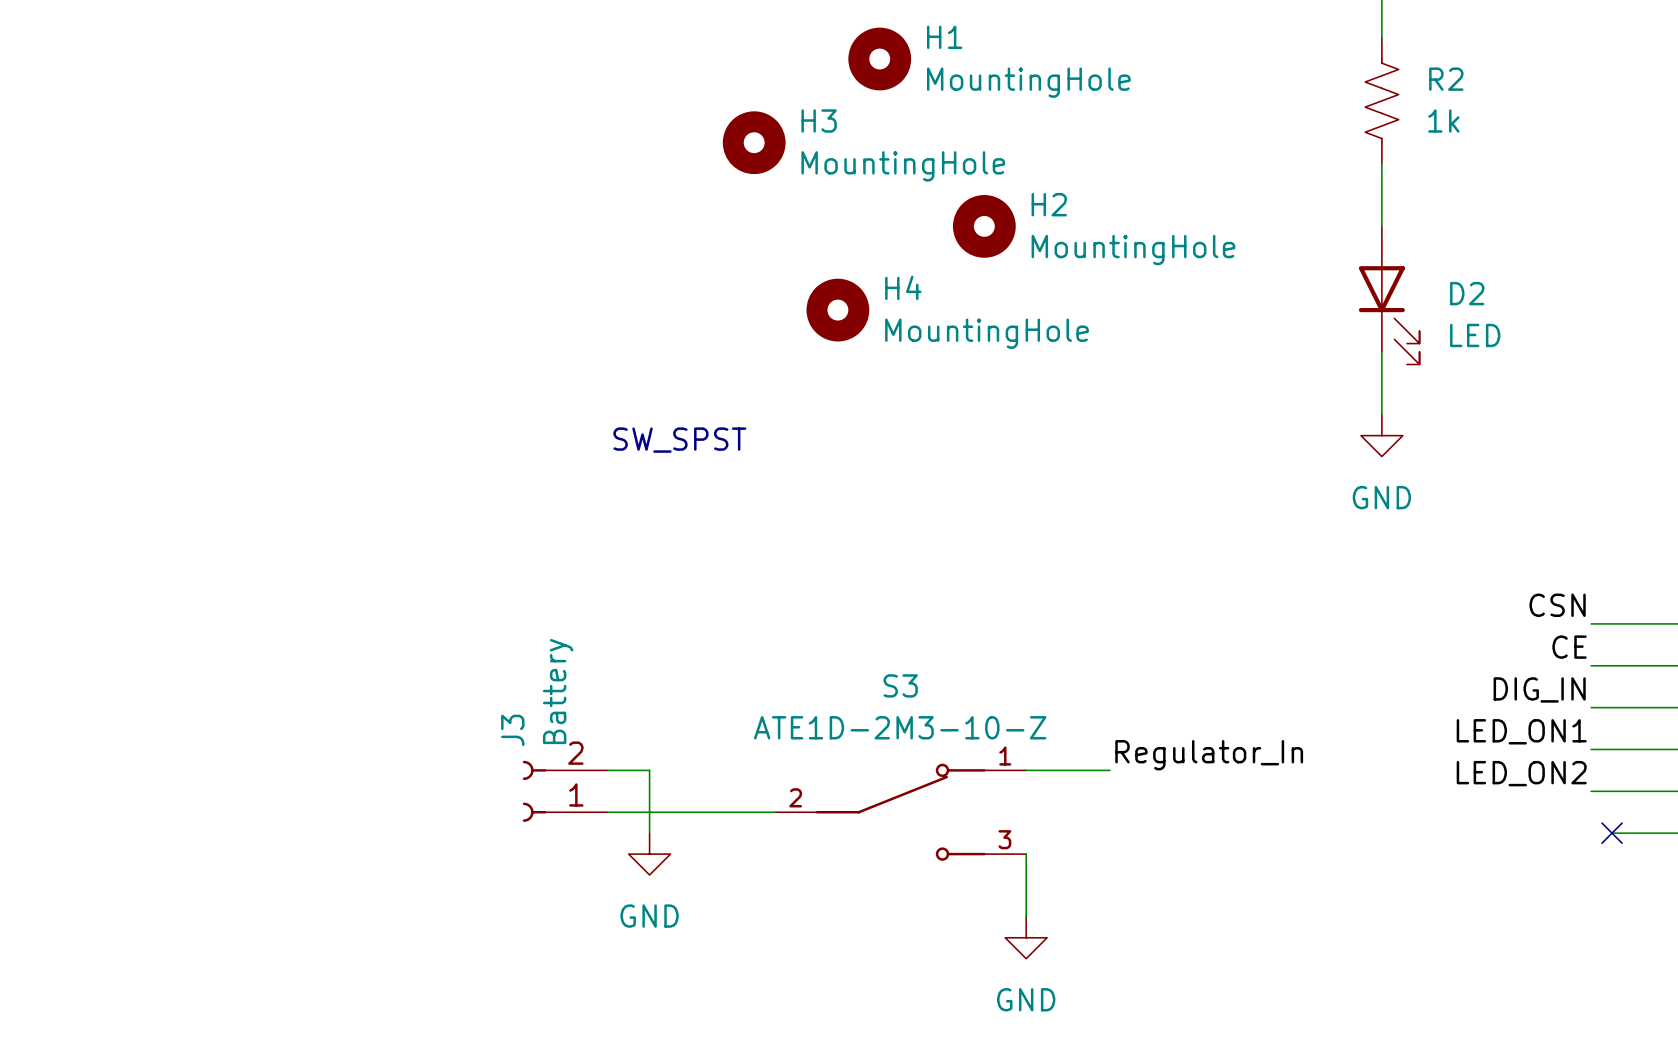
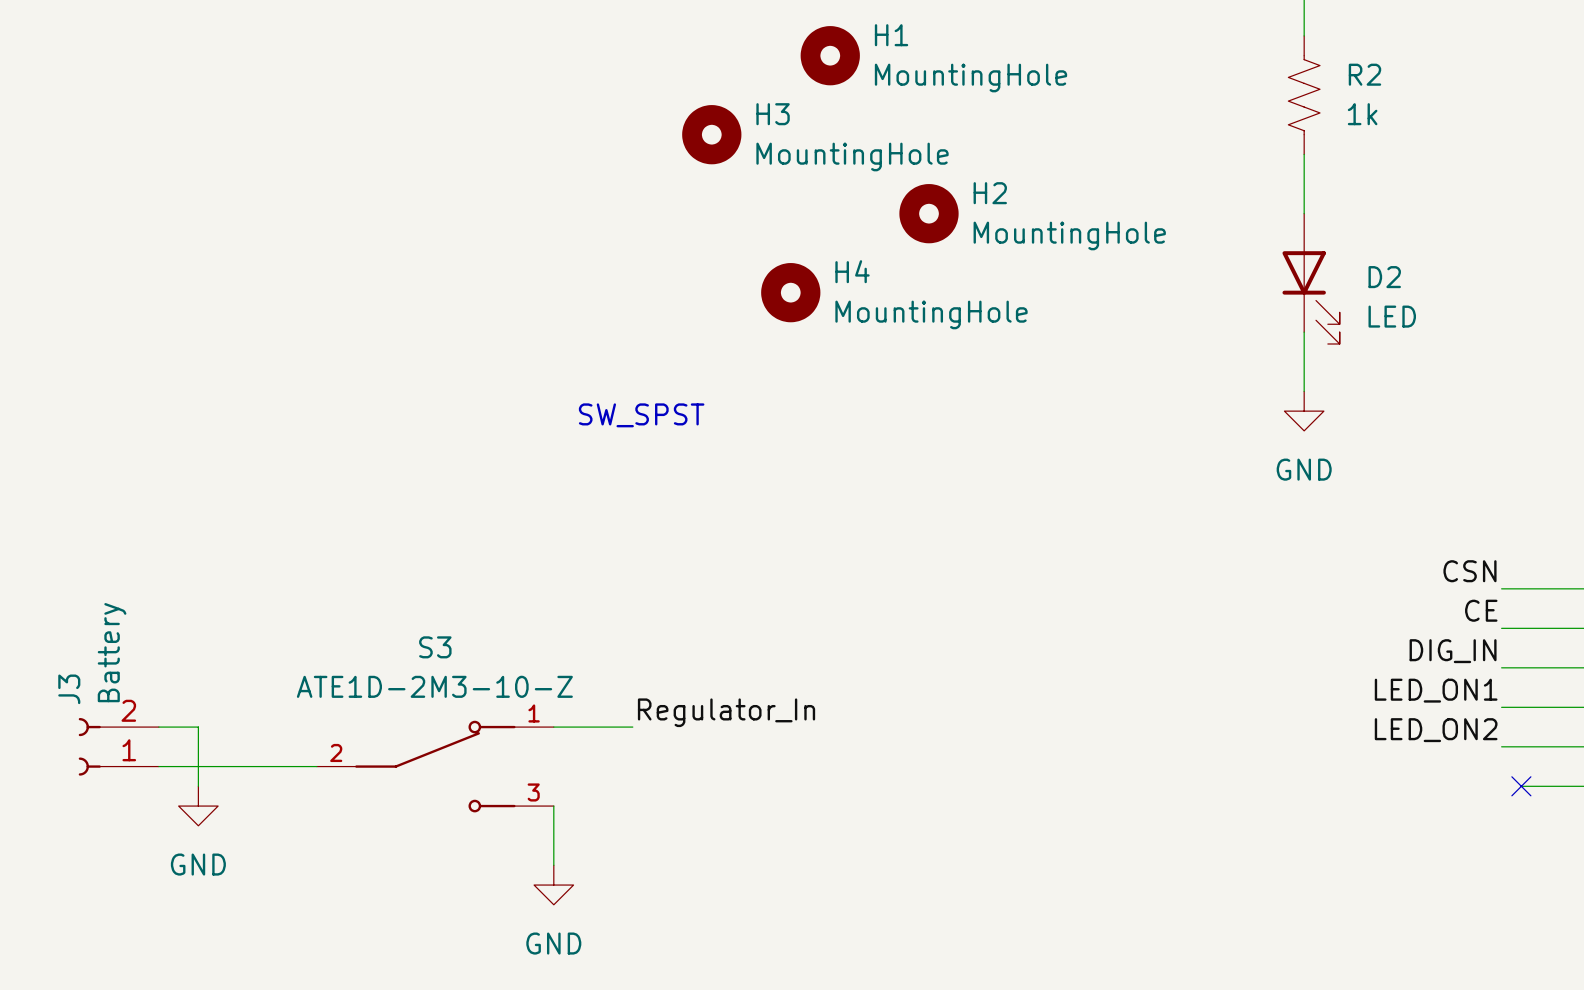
label: none -> Regulator_In (726, 712)
label: Regulator_In (1209, 755) -> none
wire: none -> (158, 727) (198, 727) (198, 786)
wire: (649, 770) (649, 833) -> (613, 727) (632, 727)
wire: (1026, 770) (1109, 770) -> none
J3 position: (565, 791) -> (118, 746)
wire: none -> (158, 766) (316, 766)
wire: (607, 812) (775, 812) -> none
S3 position: (900, 812) -> (435, 766)
power symbol: none -> GND (198, 806)
wire: none -> (553, 806) (553, 865)
power symbol position: GND (649, 854) -> GND (553, 885)
wire: (1026, 854) (1026, 916) -> none
power symbol: GND (1026, 937) -> none

